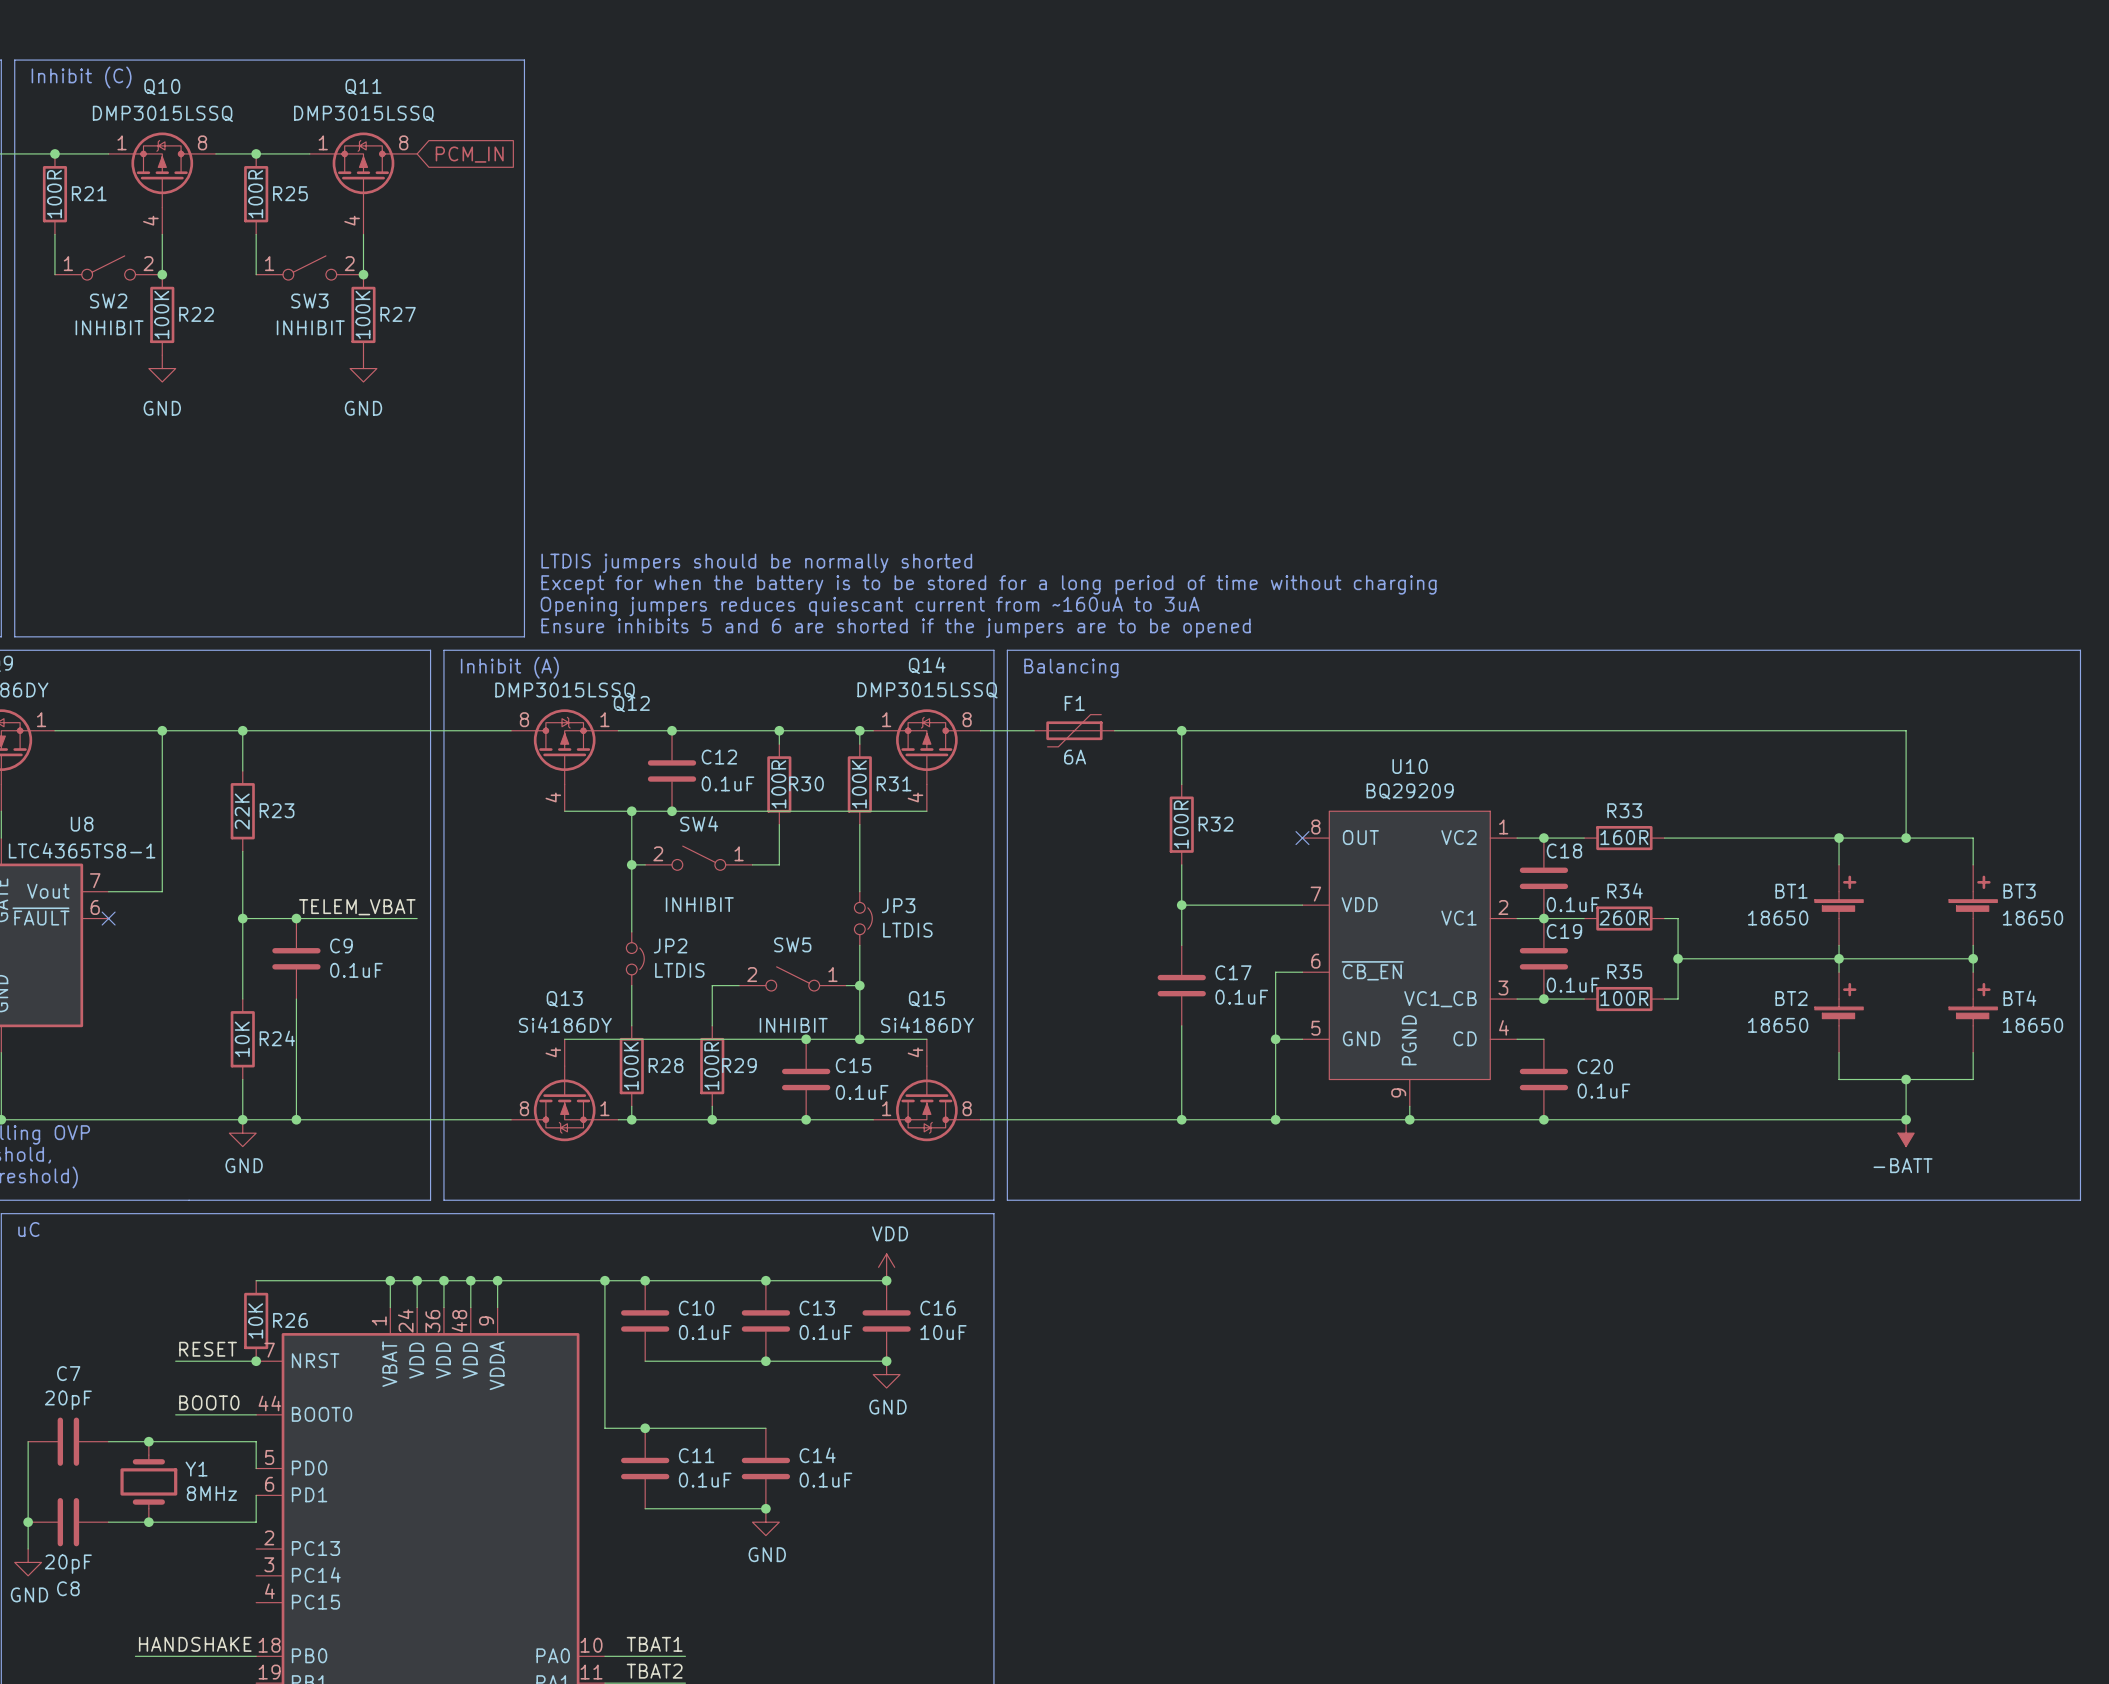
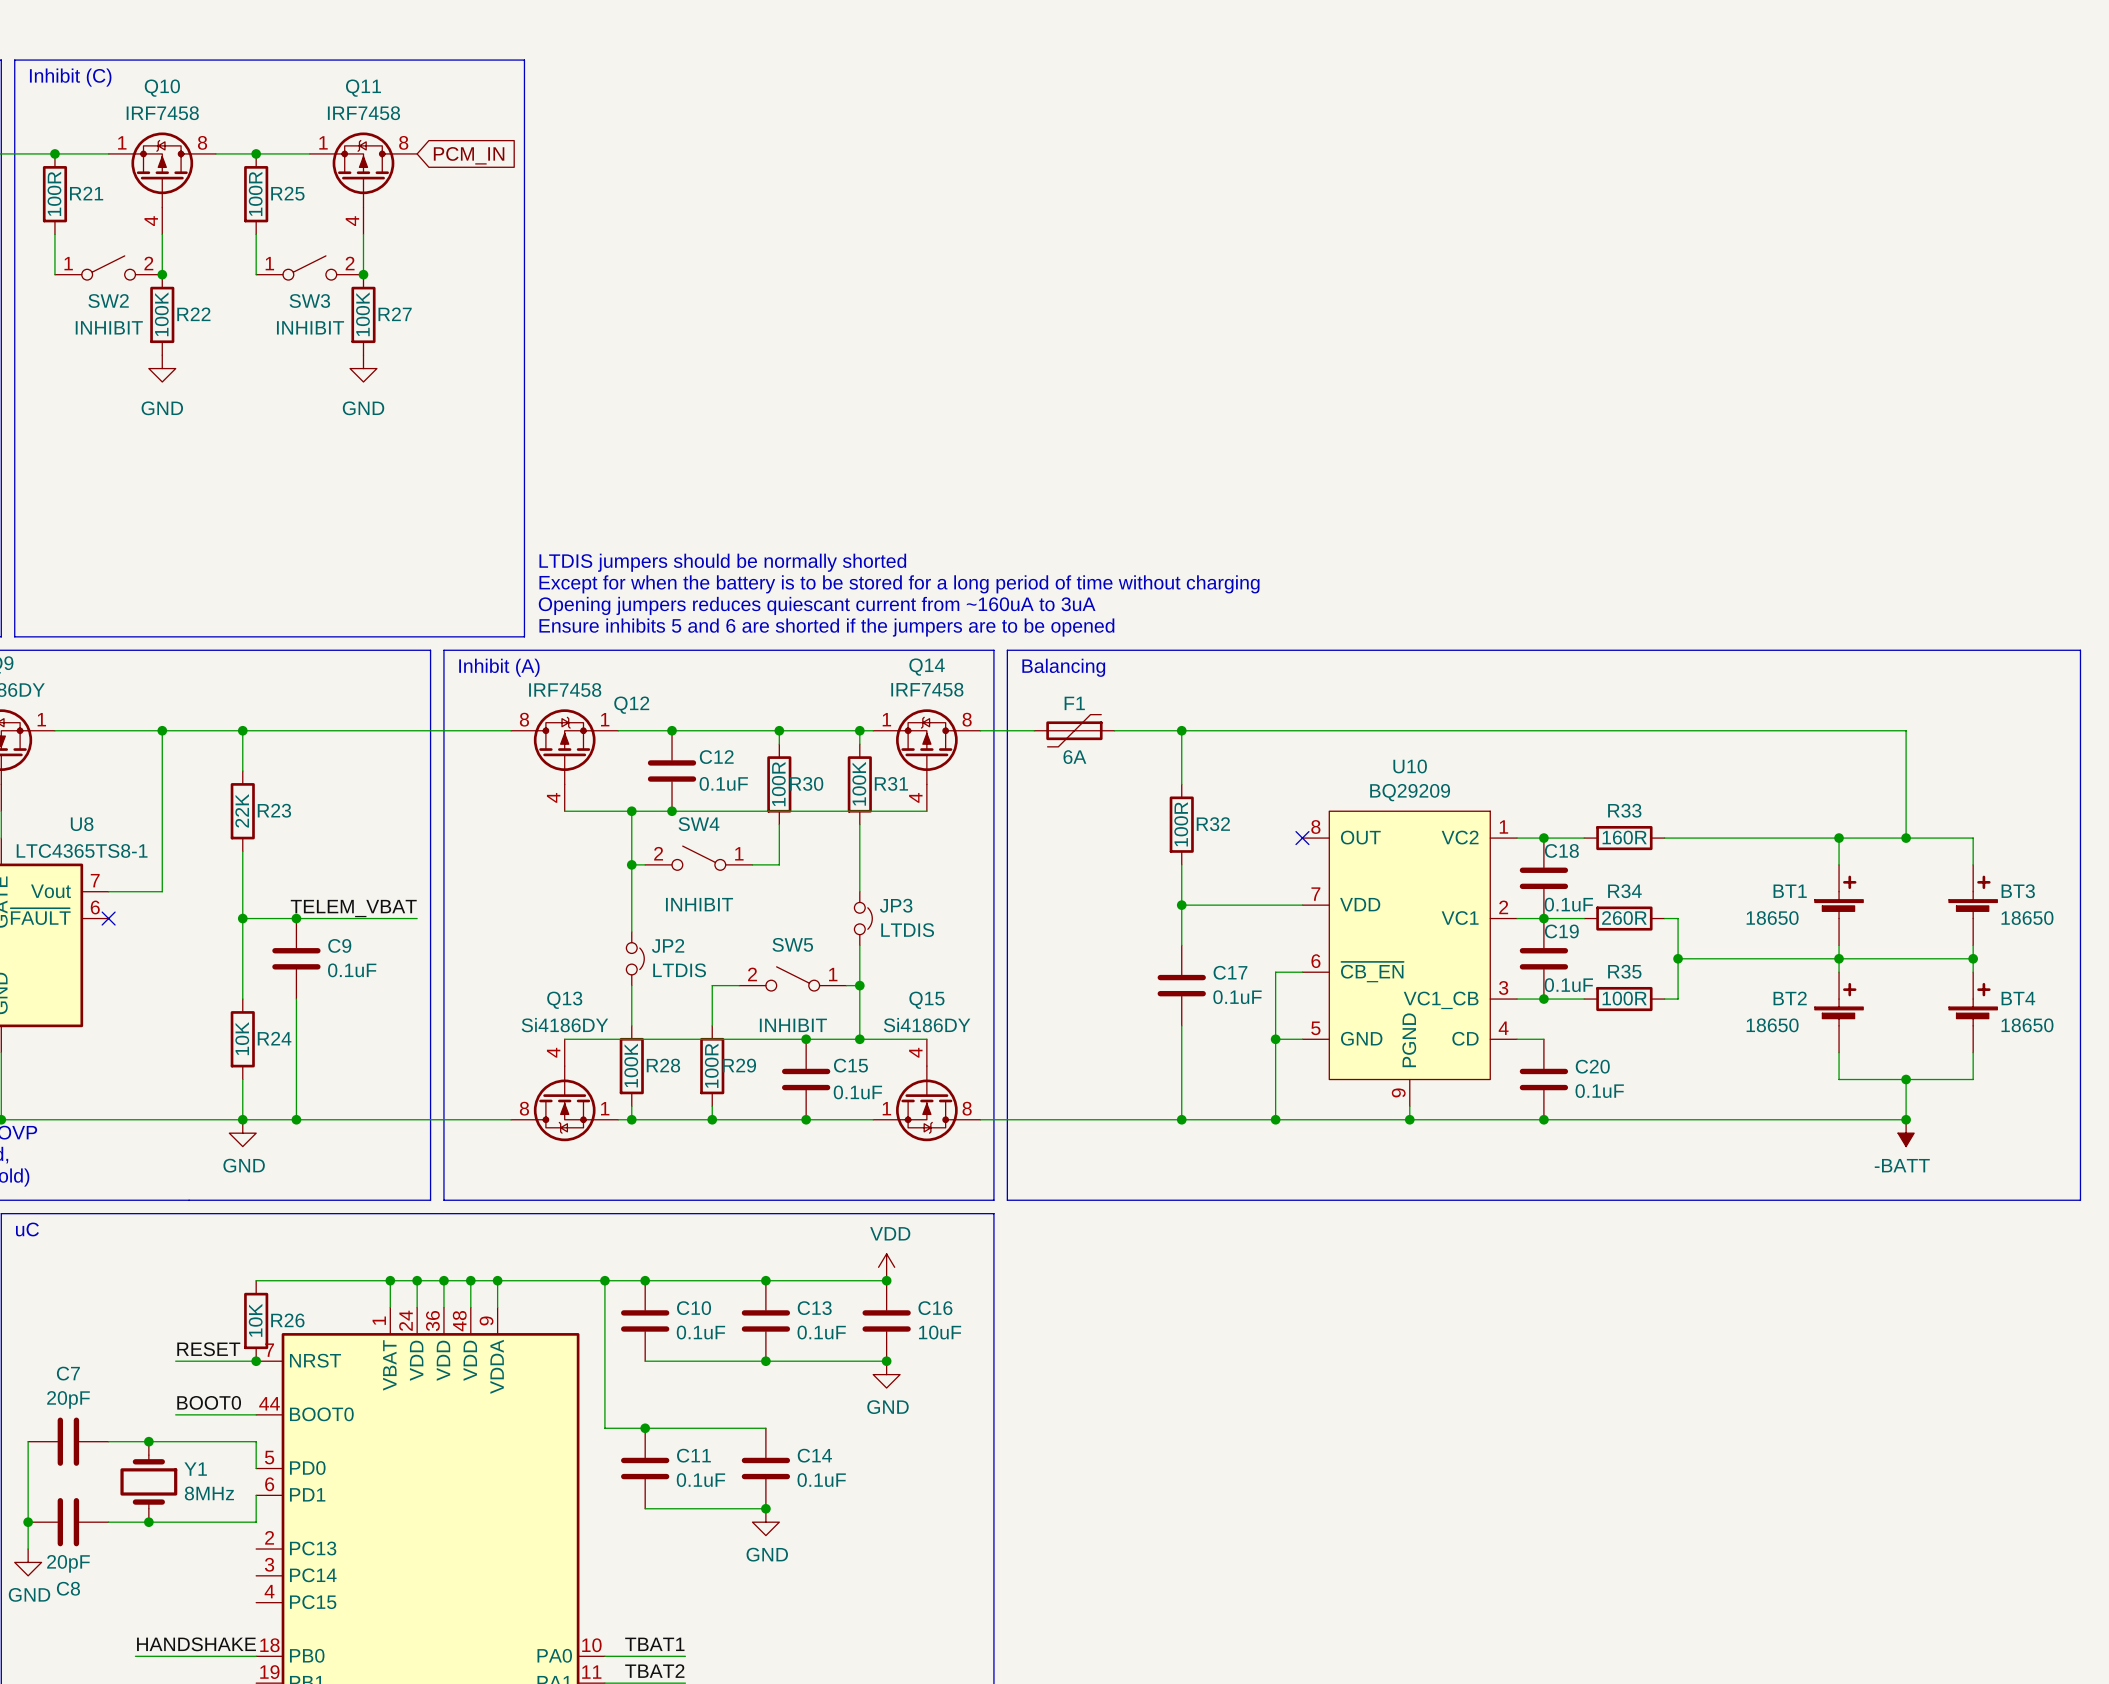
Q10 value: DMP3015LSSQ (162, 113) -> IRF7458 (162, 113)
Q11 value: DMP3015LSSQ (364, 113) -> IRF7458 (363, 113)
Q12 value: DMP3015LSSQ (565, 690) -> IRF7458 (565, 690)
Q14 value: DMP3015LSSQ (927, 690) -> IRF7458 (927, 689)

